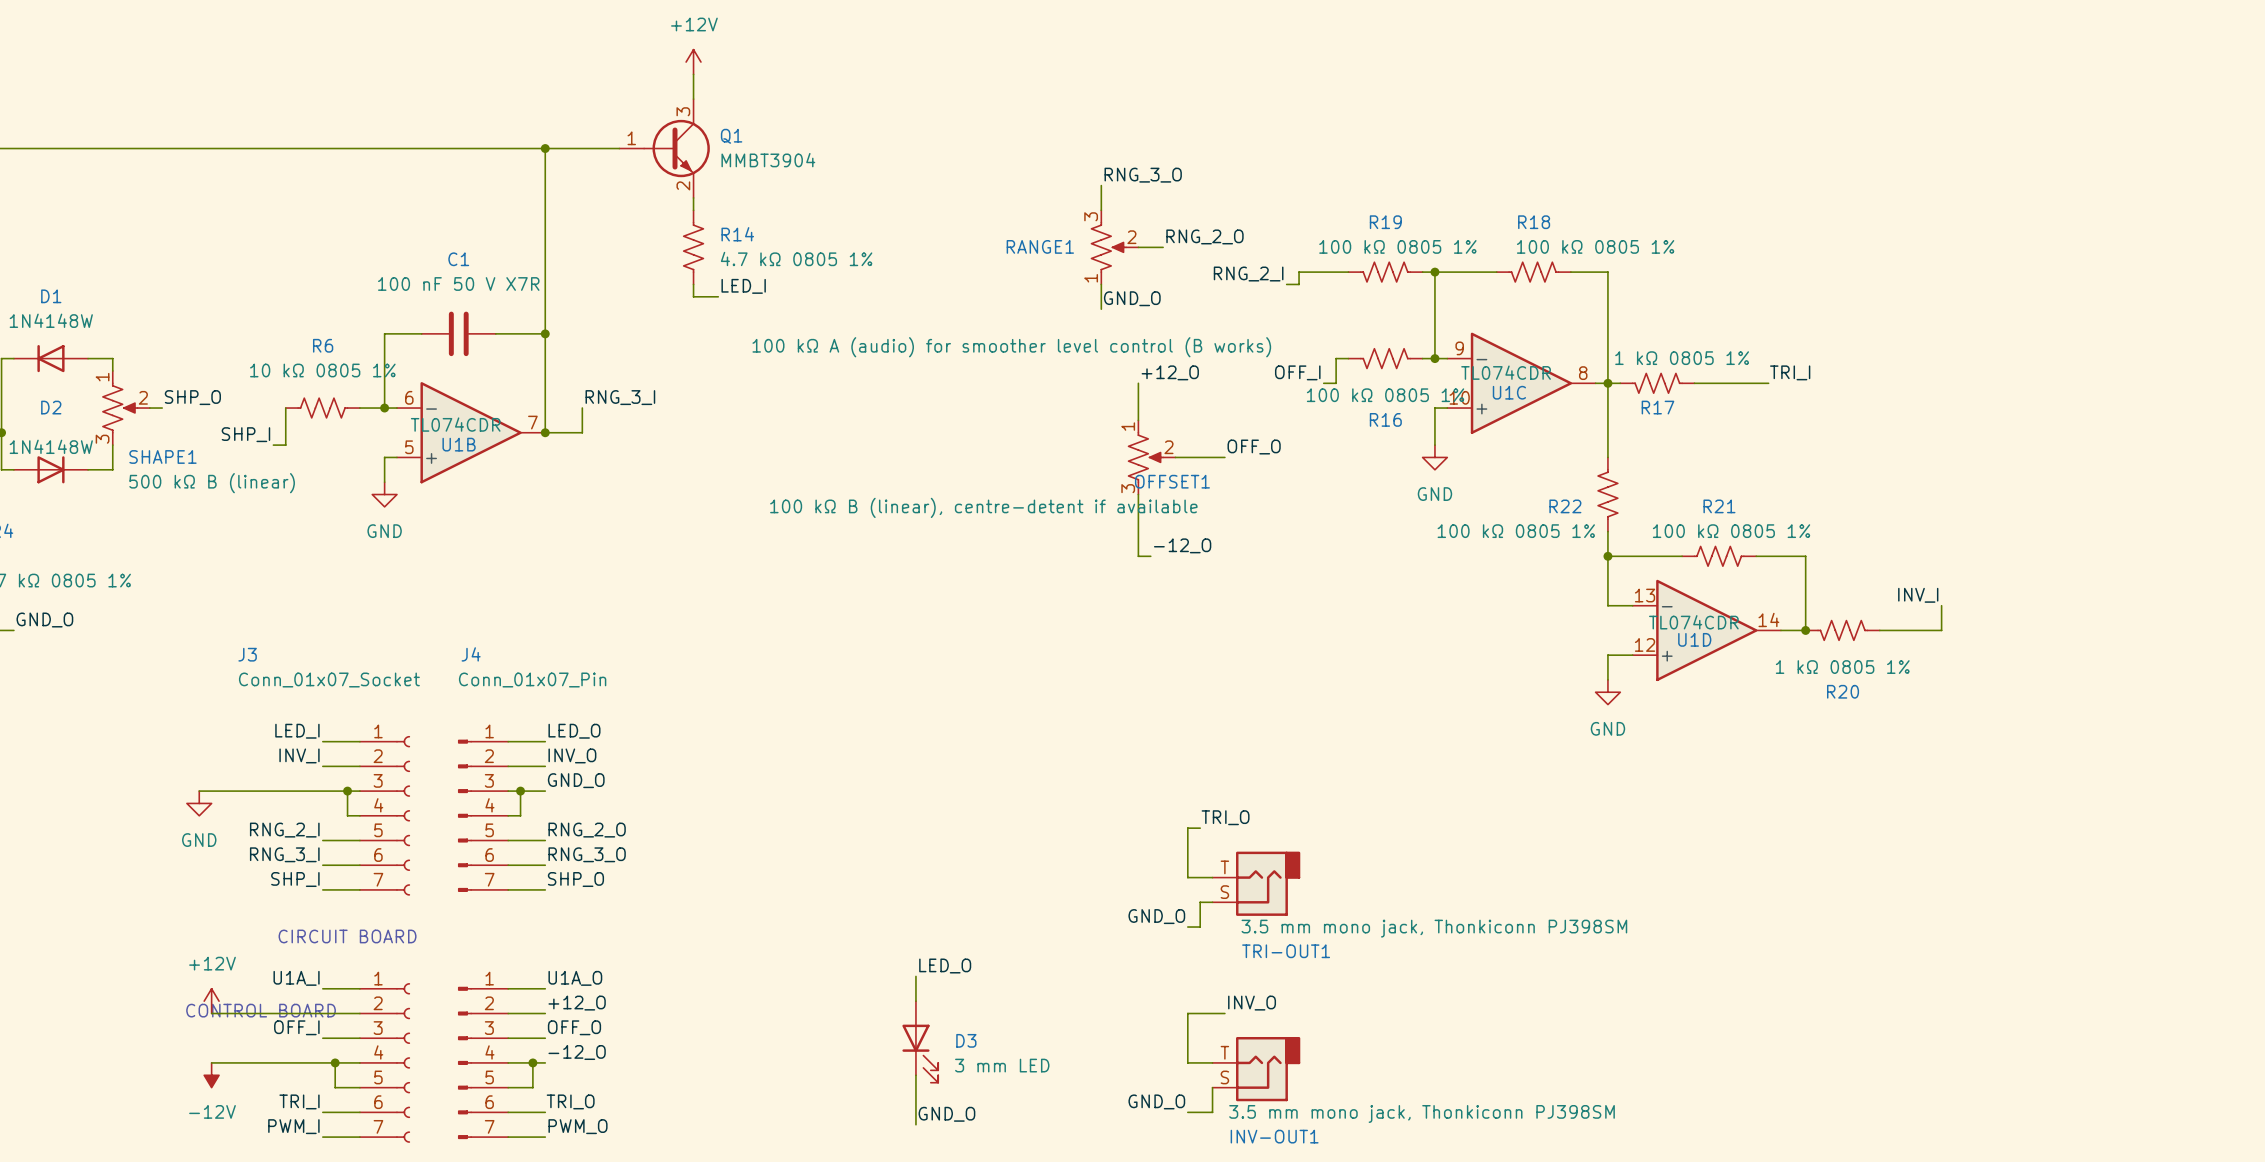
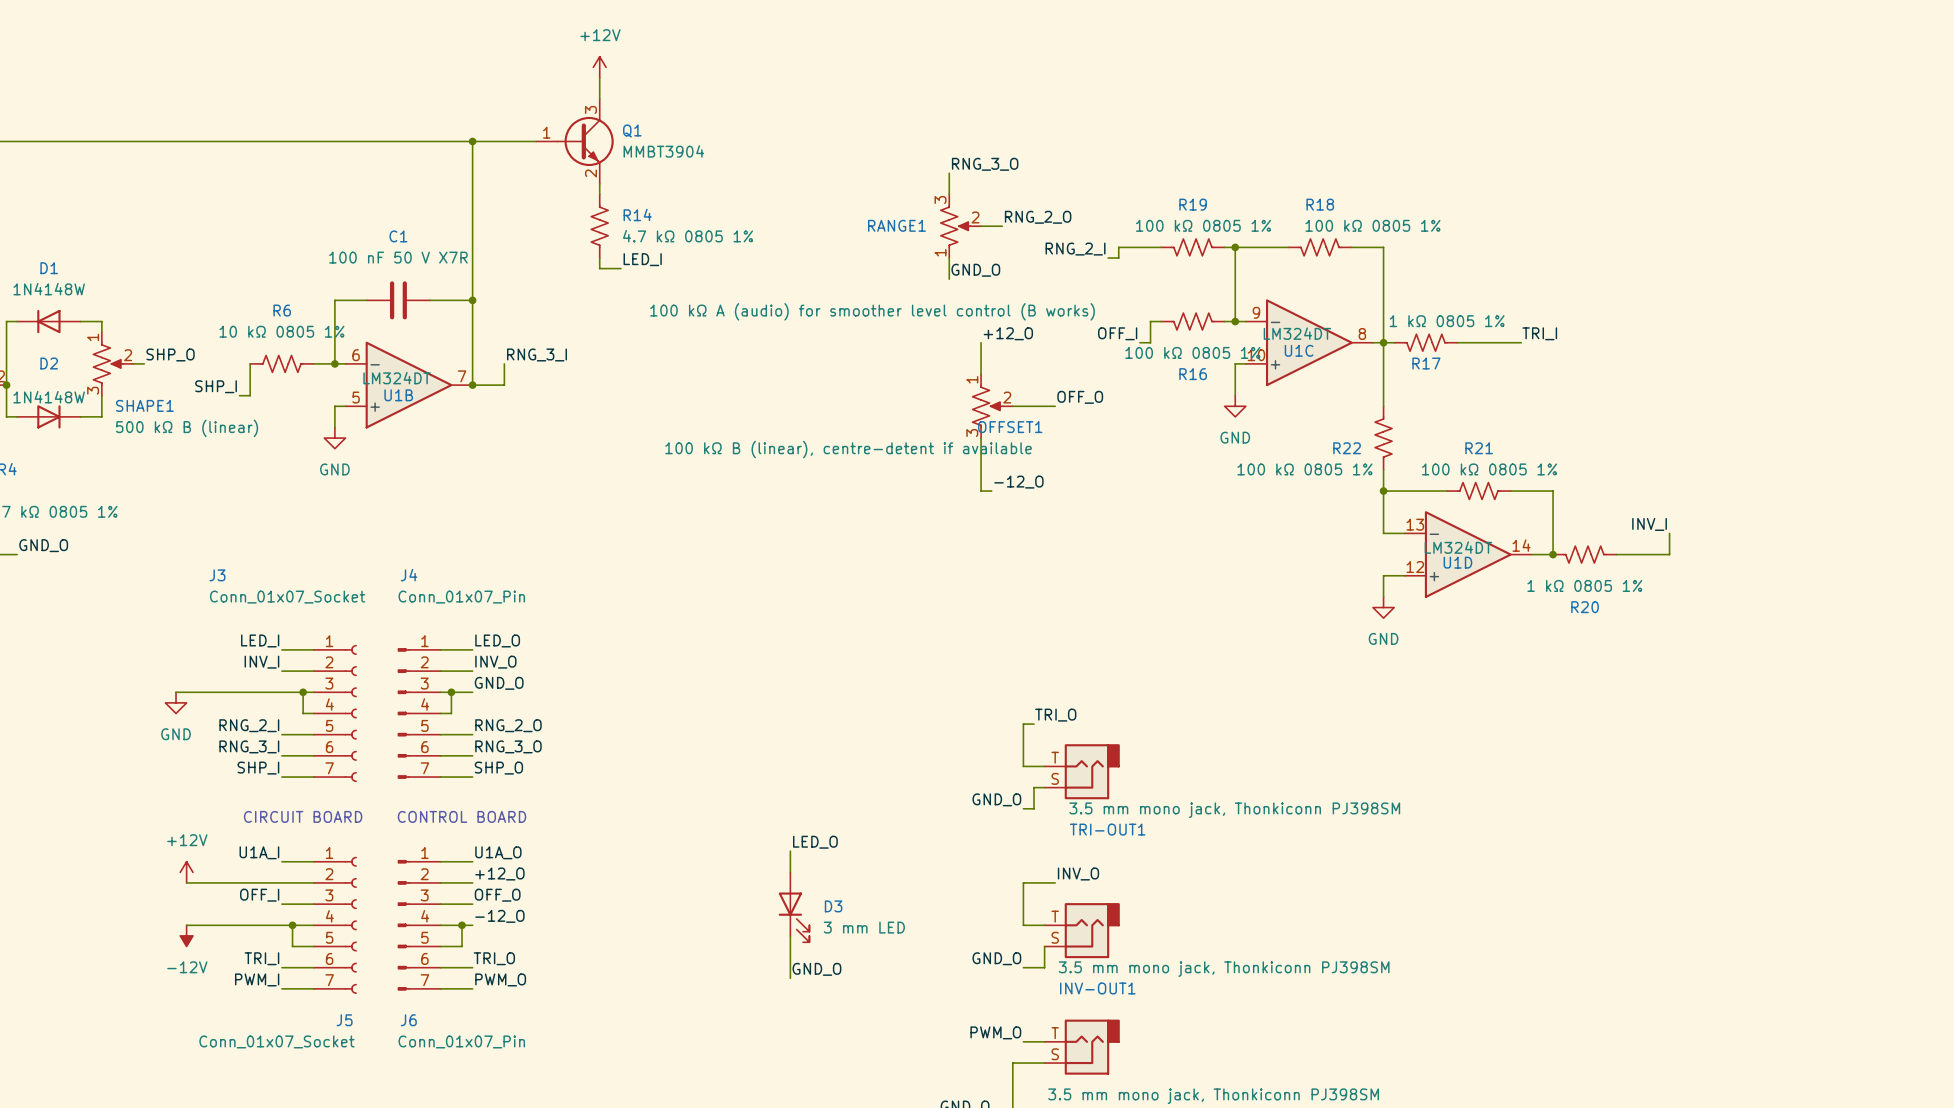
U1C value: TL074CDR (1506, 372) -> LM324DT (1297, 333)
U1B value: TL074CDR (455, 424) -> LM324DT (397, 378)
U1D value: TL074CDR (1693, 622) -> LM324DT (1458, 547)
text: none -> CONTROL BOARD (462, 816)
text: CONTROL BOARD (261, 1010) -> none

